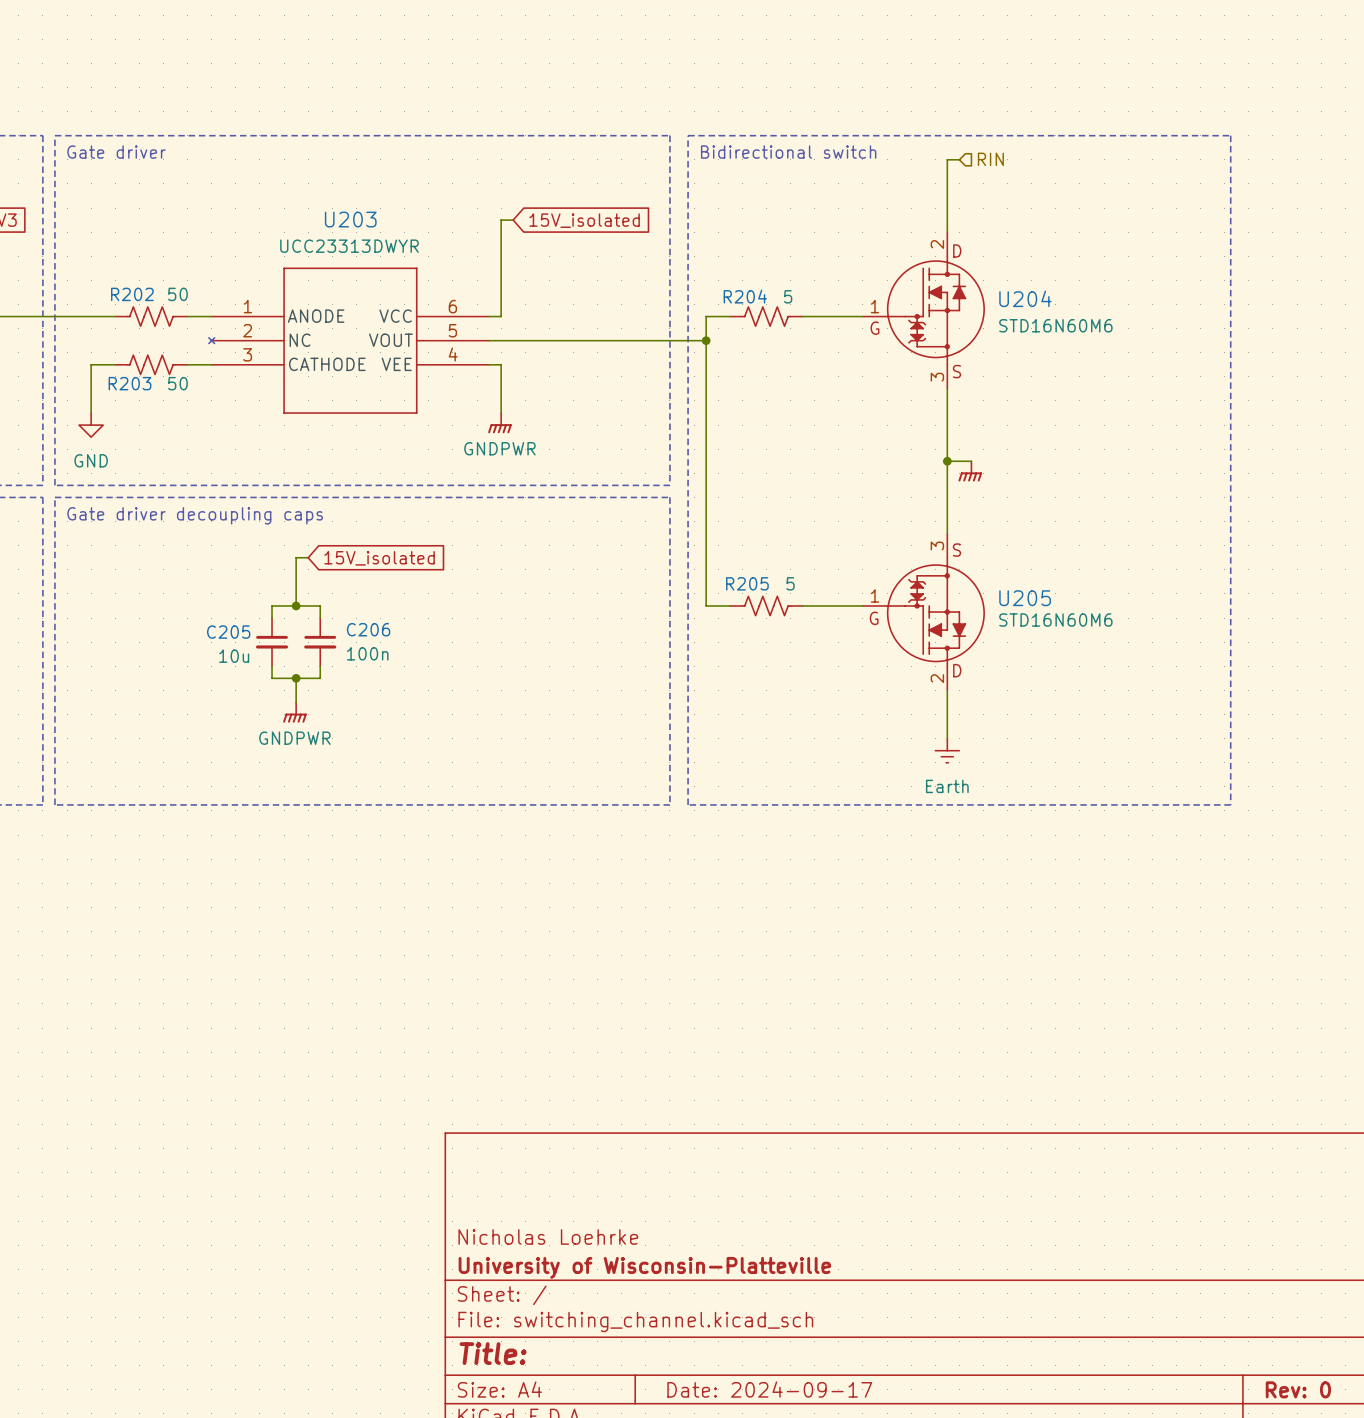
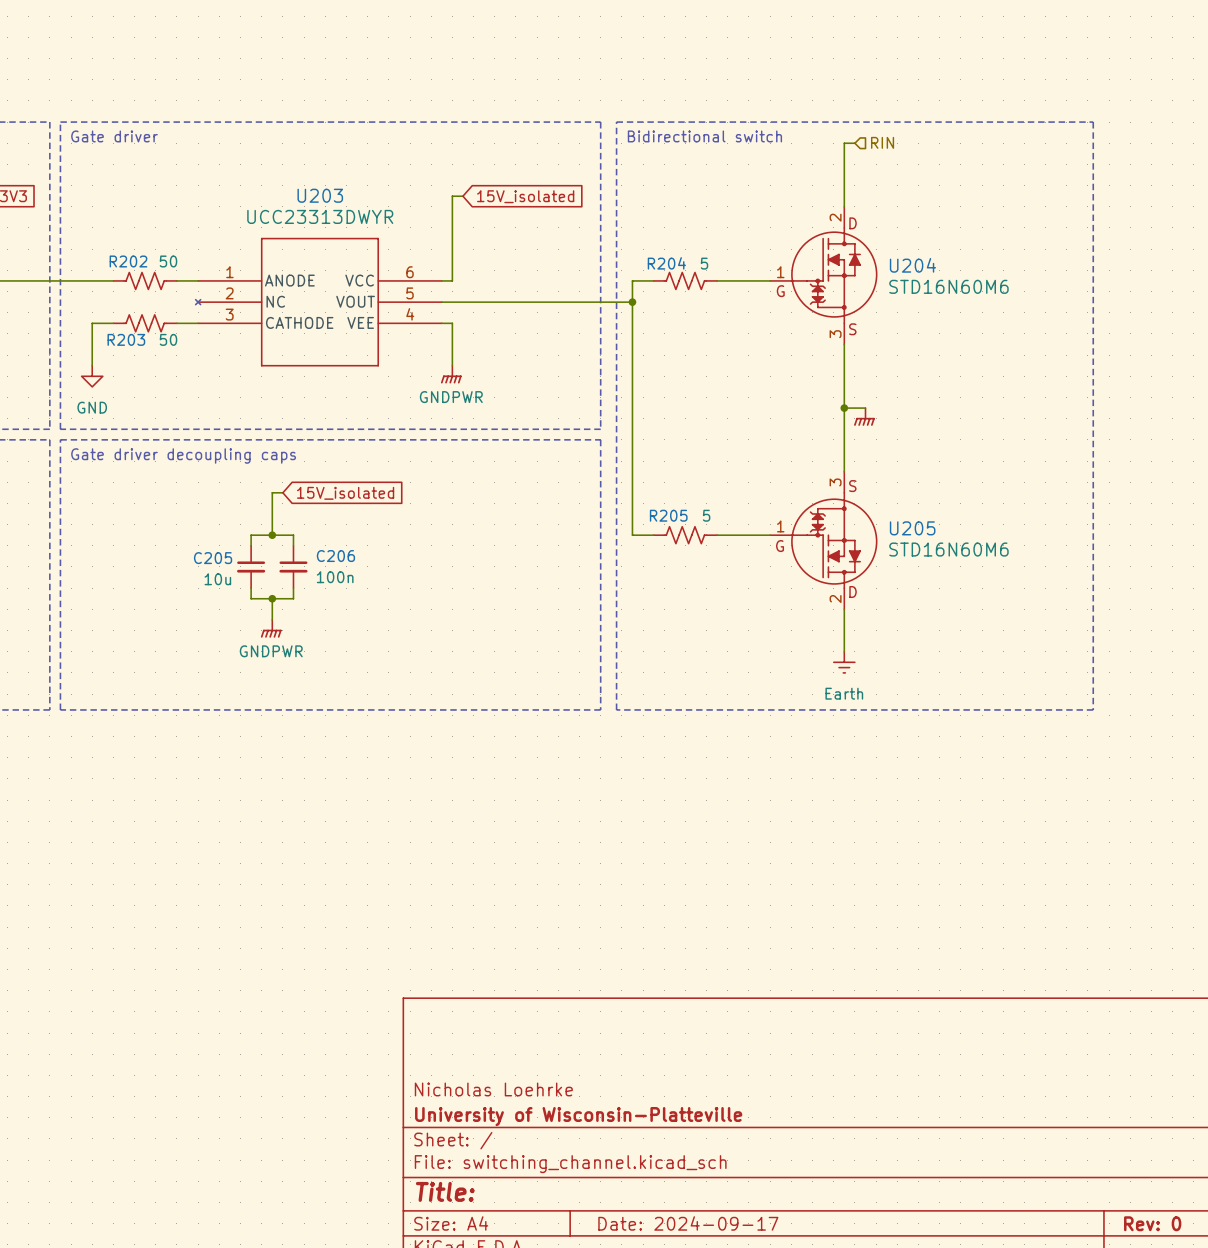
U203 value: none -> UCC23313DWYR (320, 216)
U203 text: UCC23313DWYR (349, 246) -> none
U204 value: none -> STD16N60M6 (948, 286)
U204 text: STD16N60M6 (1055, 325) -> none
U205 text: STD16N60M6 (1055, 620) -> none
U205 value: none -> STD16N60M6 (948, 549)

